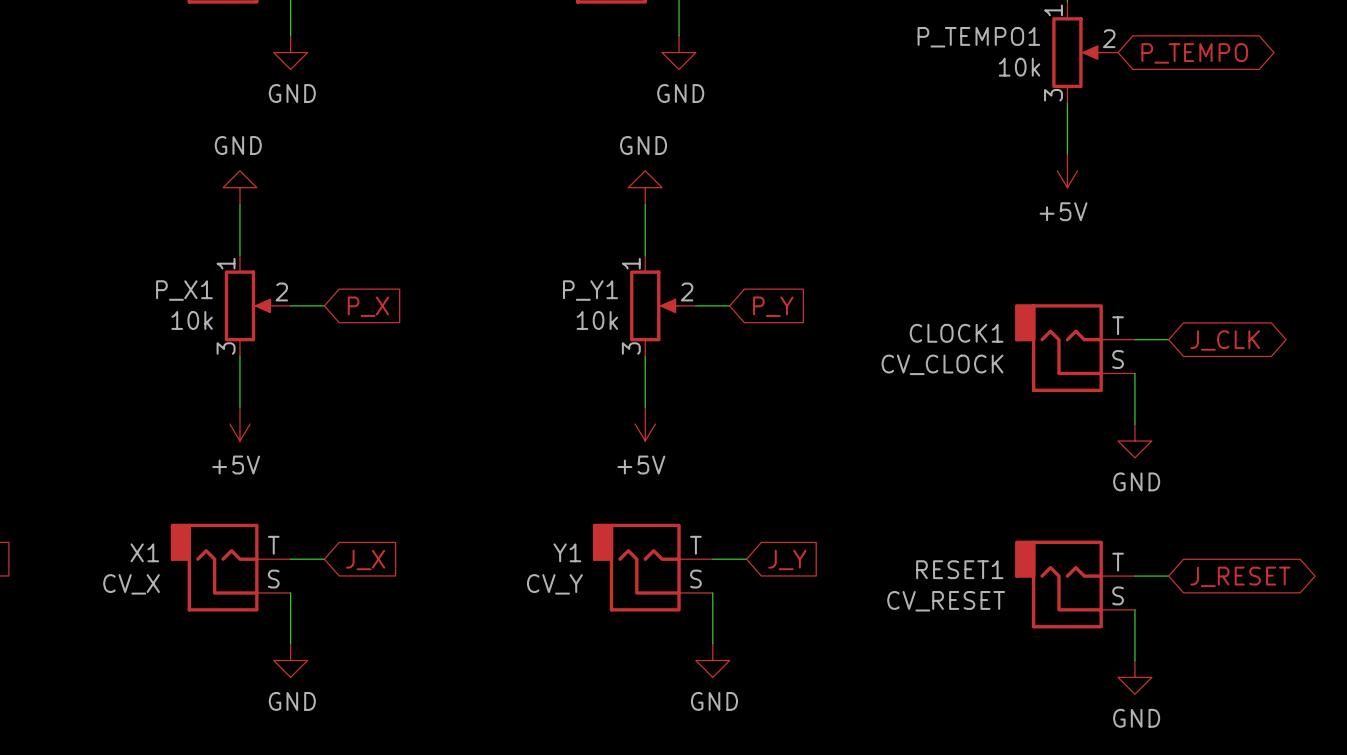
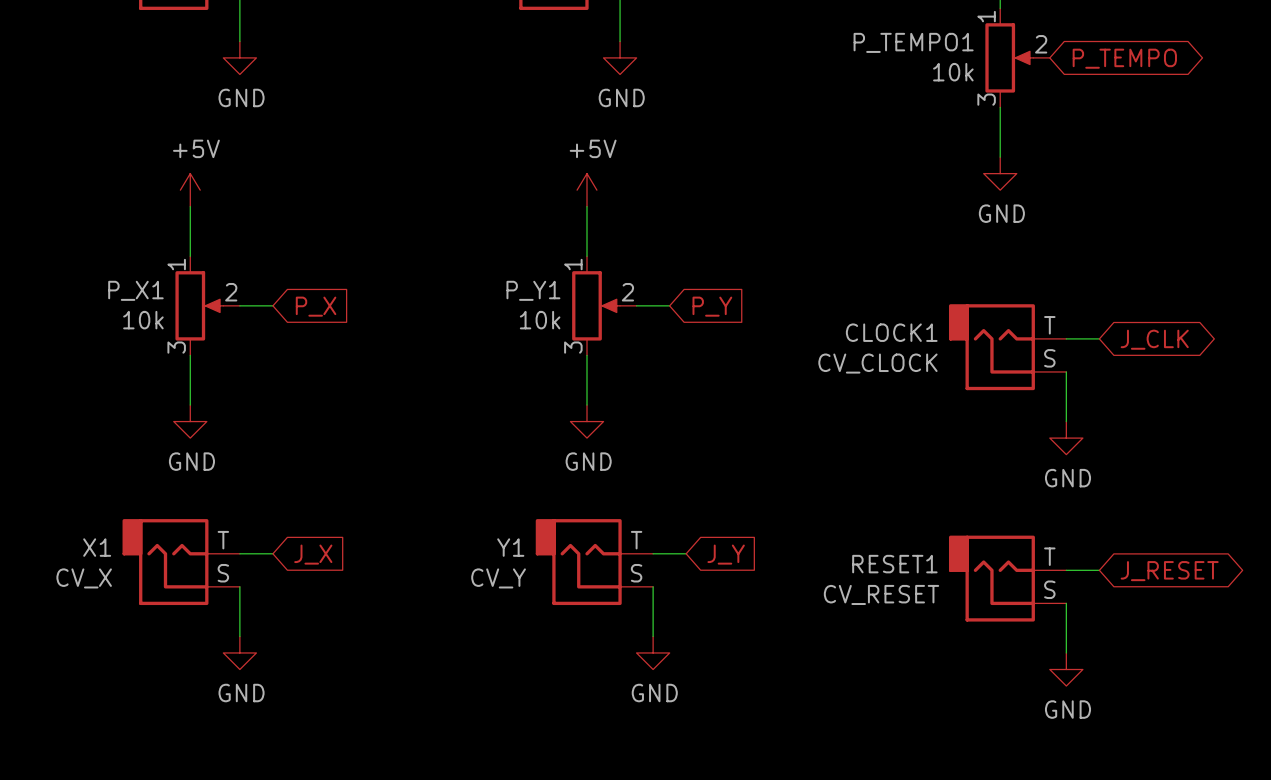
power symbol: +5V (1067, 170) -> GND (1000, 173)
power symbol: GND (239, 187) -> +5V (190, 190)
power symbol: GND (645, 187) -> +5V (586, 190)
power symbol: +5V (239, 424) -> GND (190, 421)
power symbol: +5V (645, 424) -> GND (586, 421)

